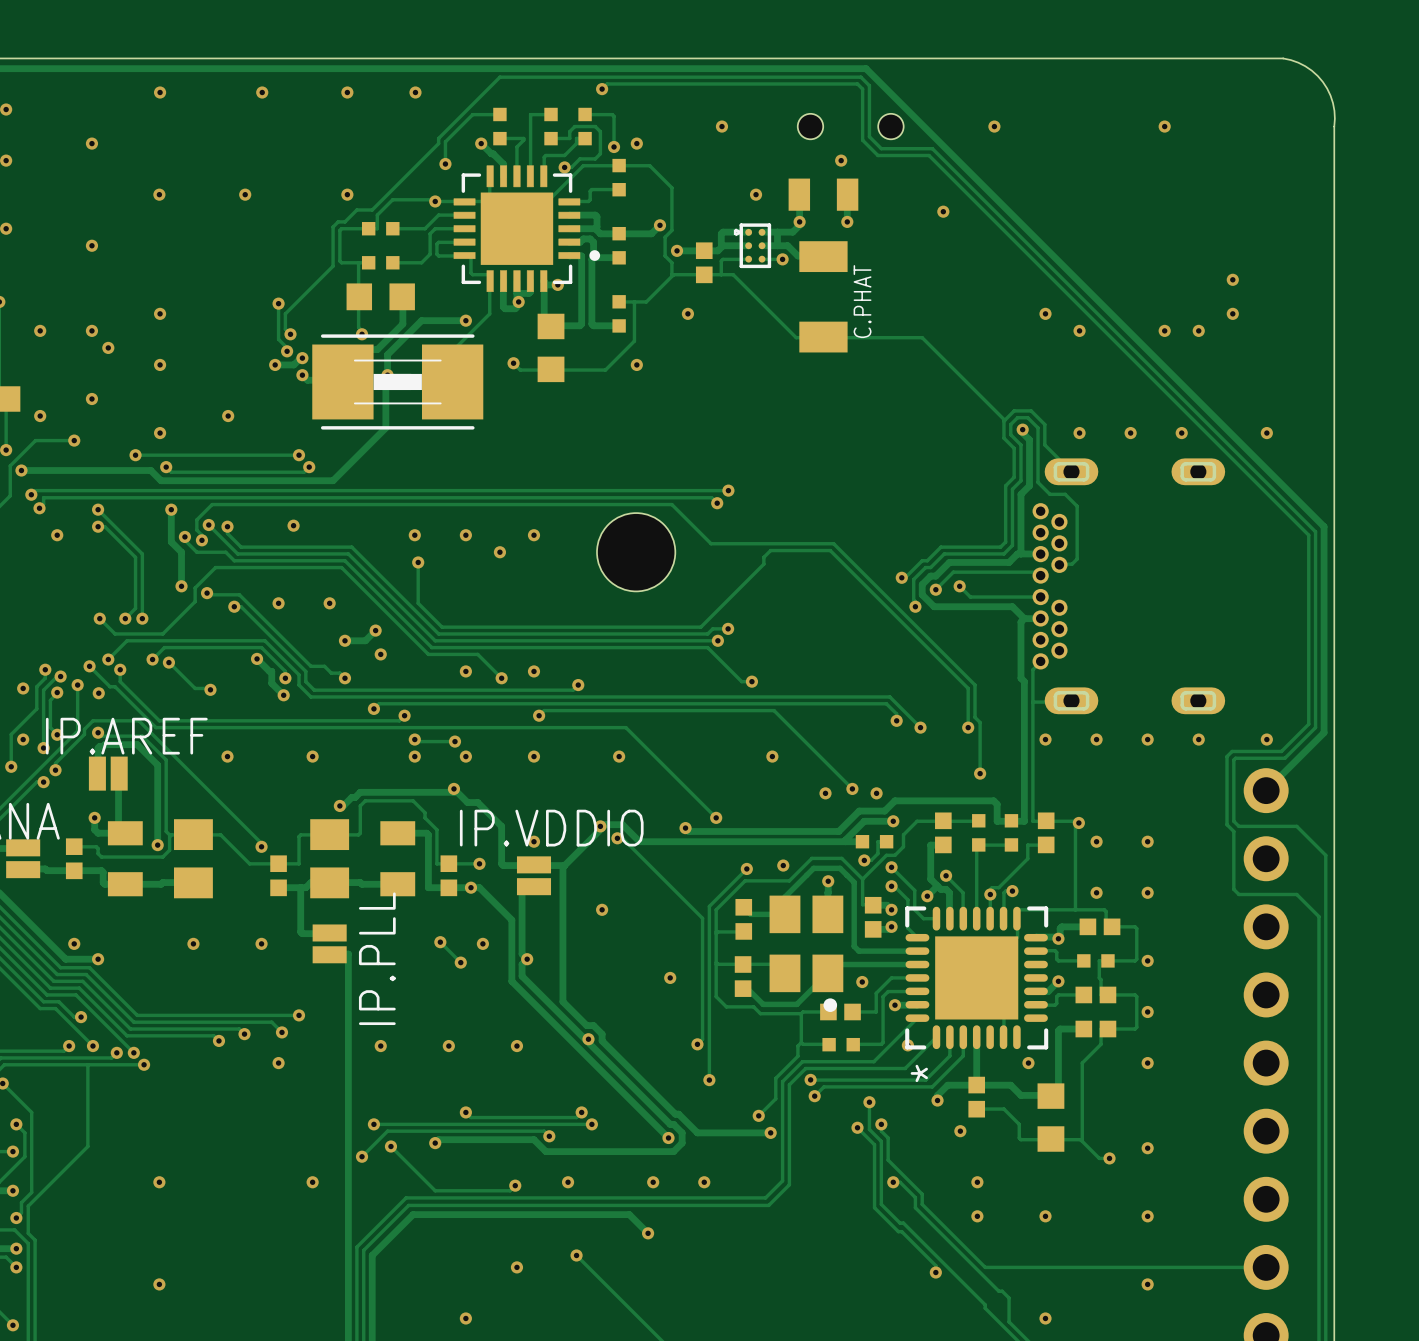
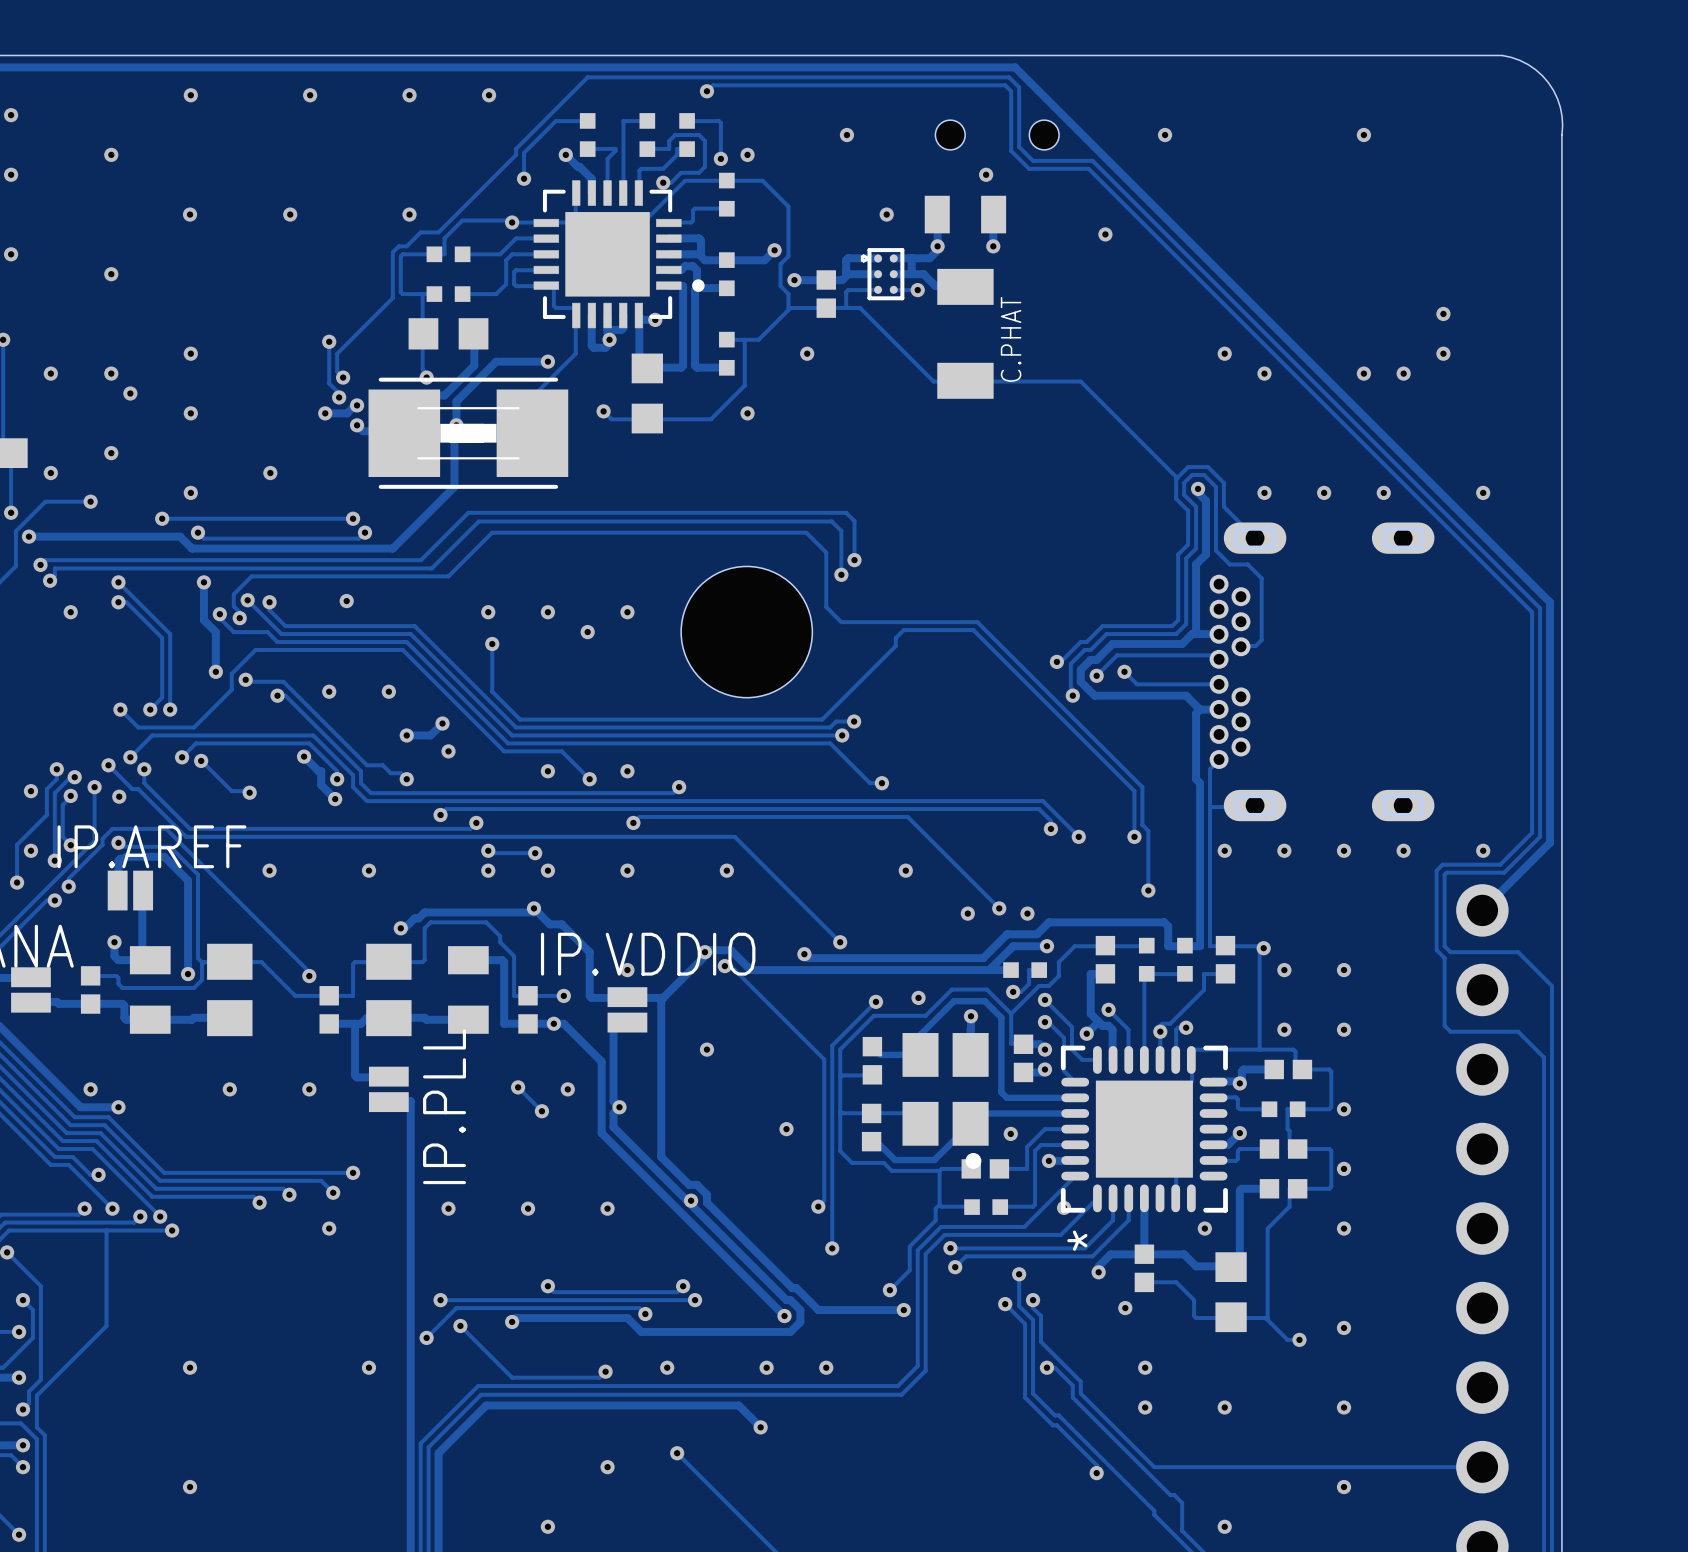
track: (728, 490) (357, 490) -> (854, 560) (854, 521) (846, 512) (468, 512) (421, 560)
track: (366, 497) (711, 497) (717, 503) -> (431, 568) (478, 521) (831, 521) (841, 531) (841, 574)
track: (380, 504) (671, 504) (711, 543) (717, 543) -> (448, 576) (492, 532) (806, 532) (826, 552) (826, 607) (841, 622)
hole size: [596, 513, 676, 592] -> [681, 566, 813, 698]

